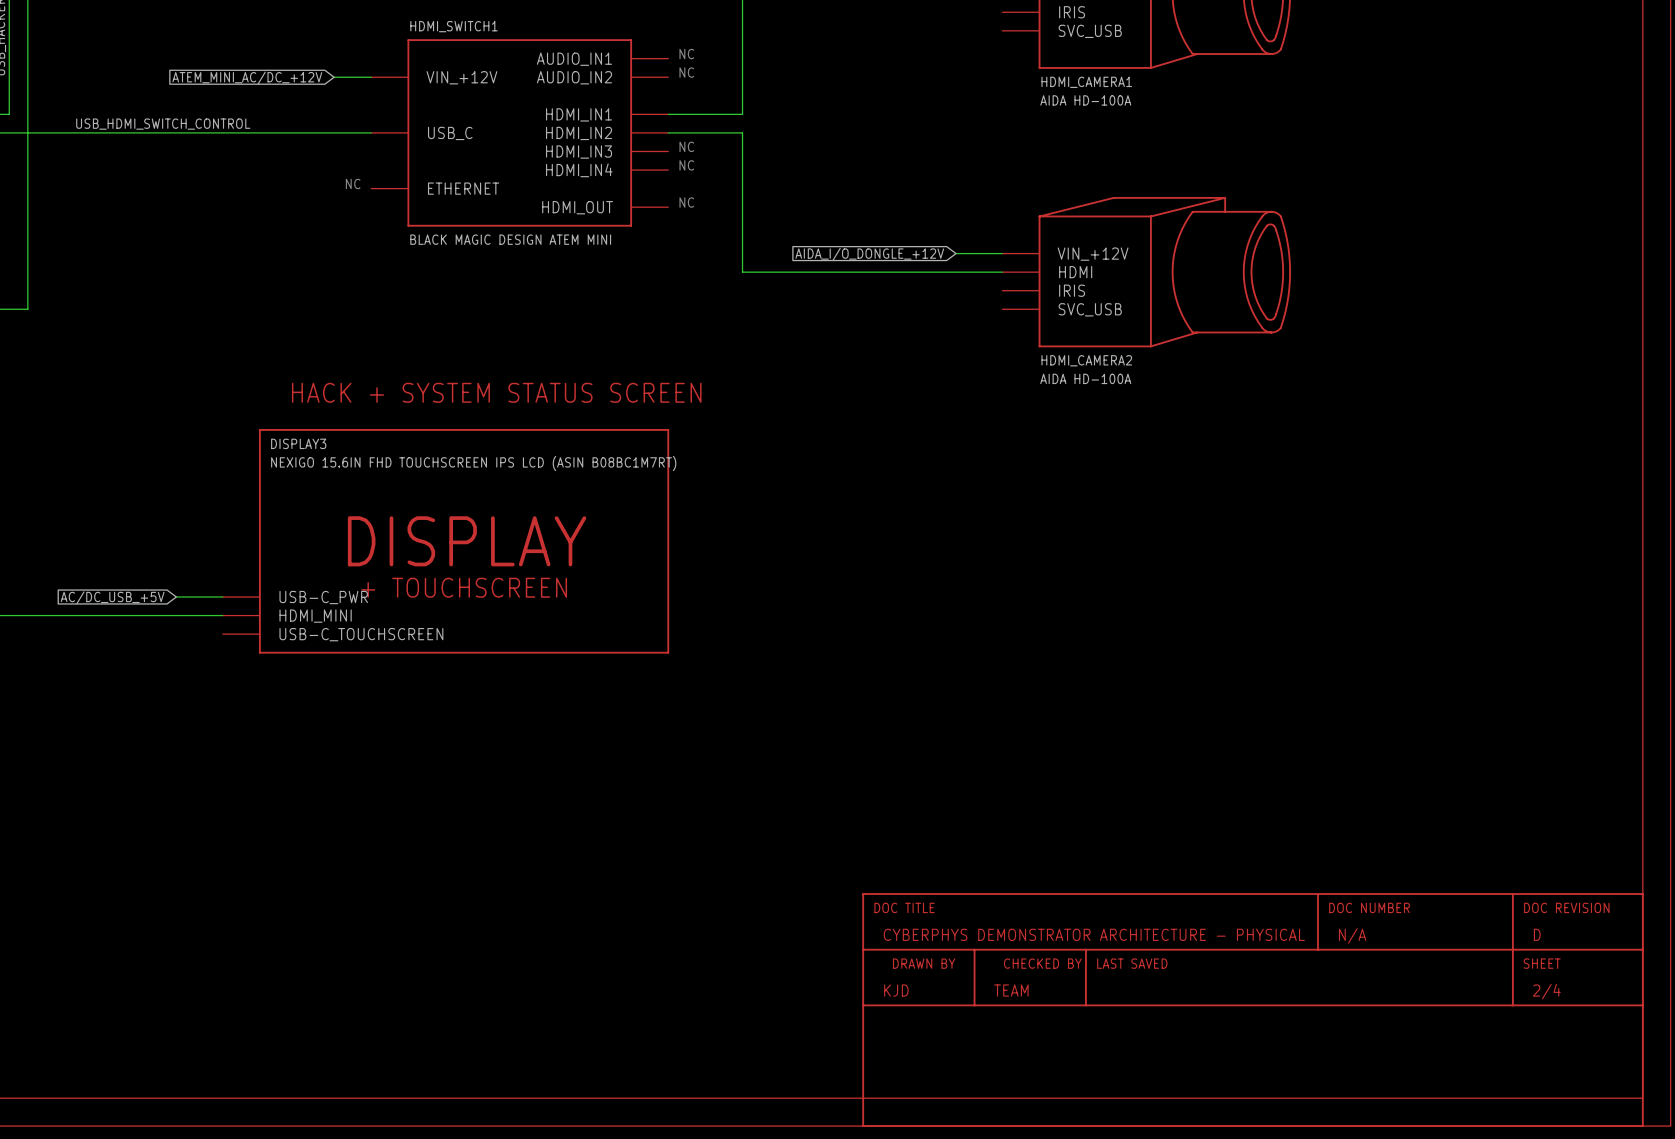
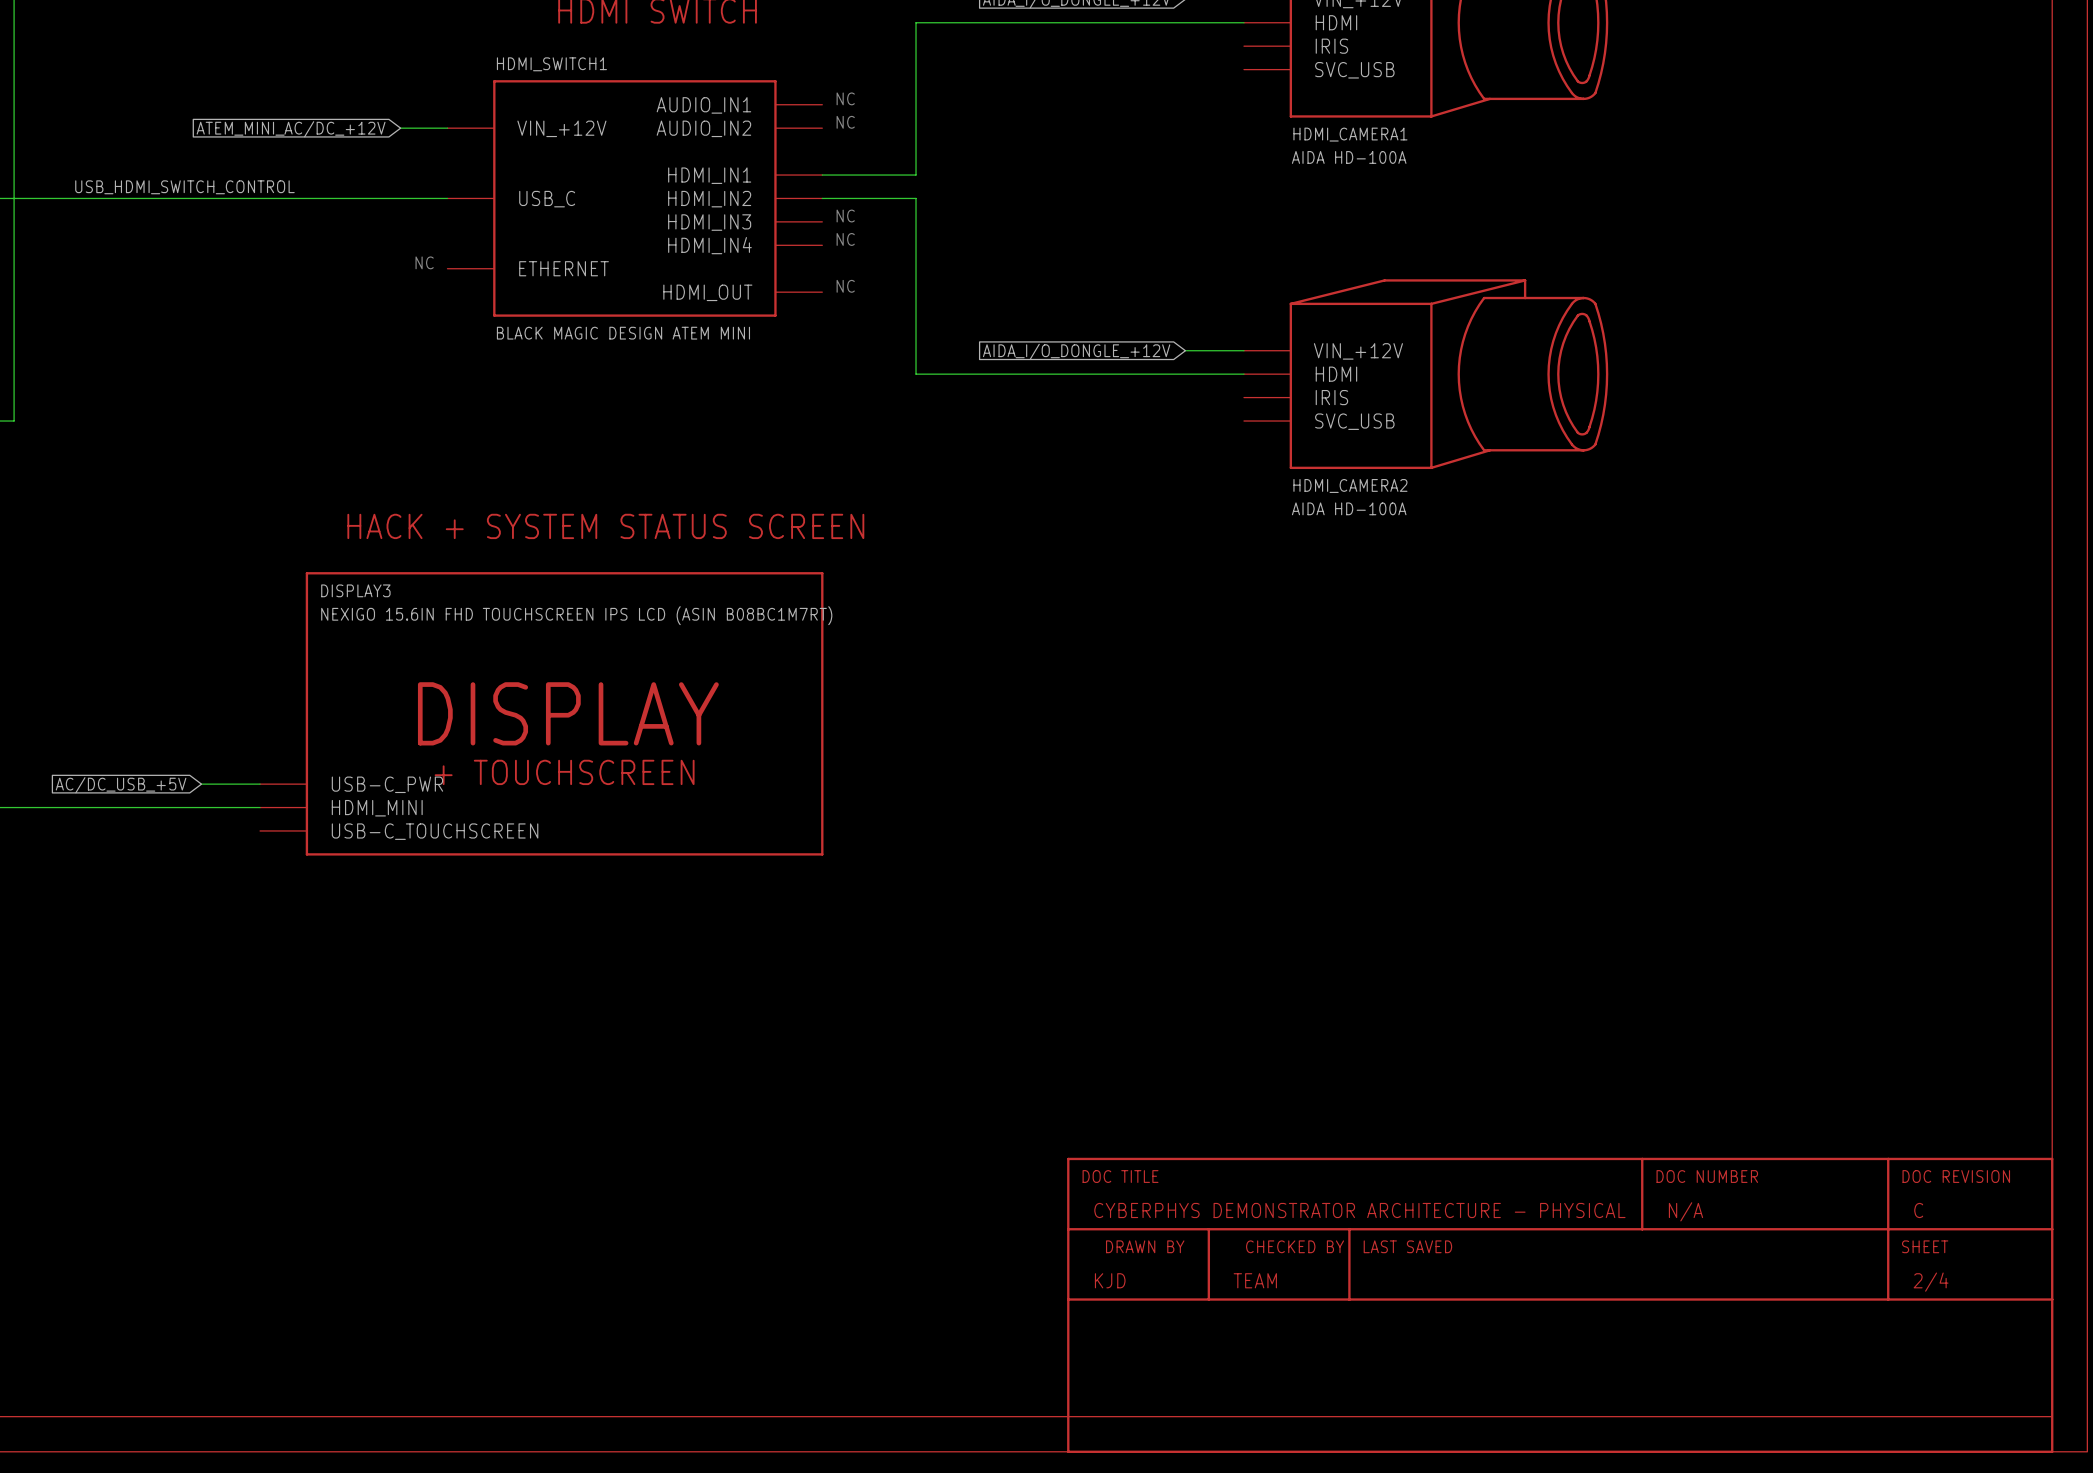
part text: D (1537, 934) -> C (1918, 1210)

